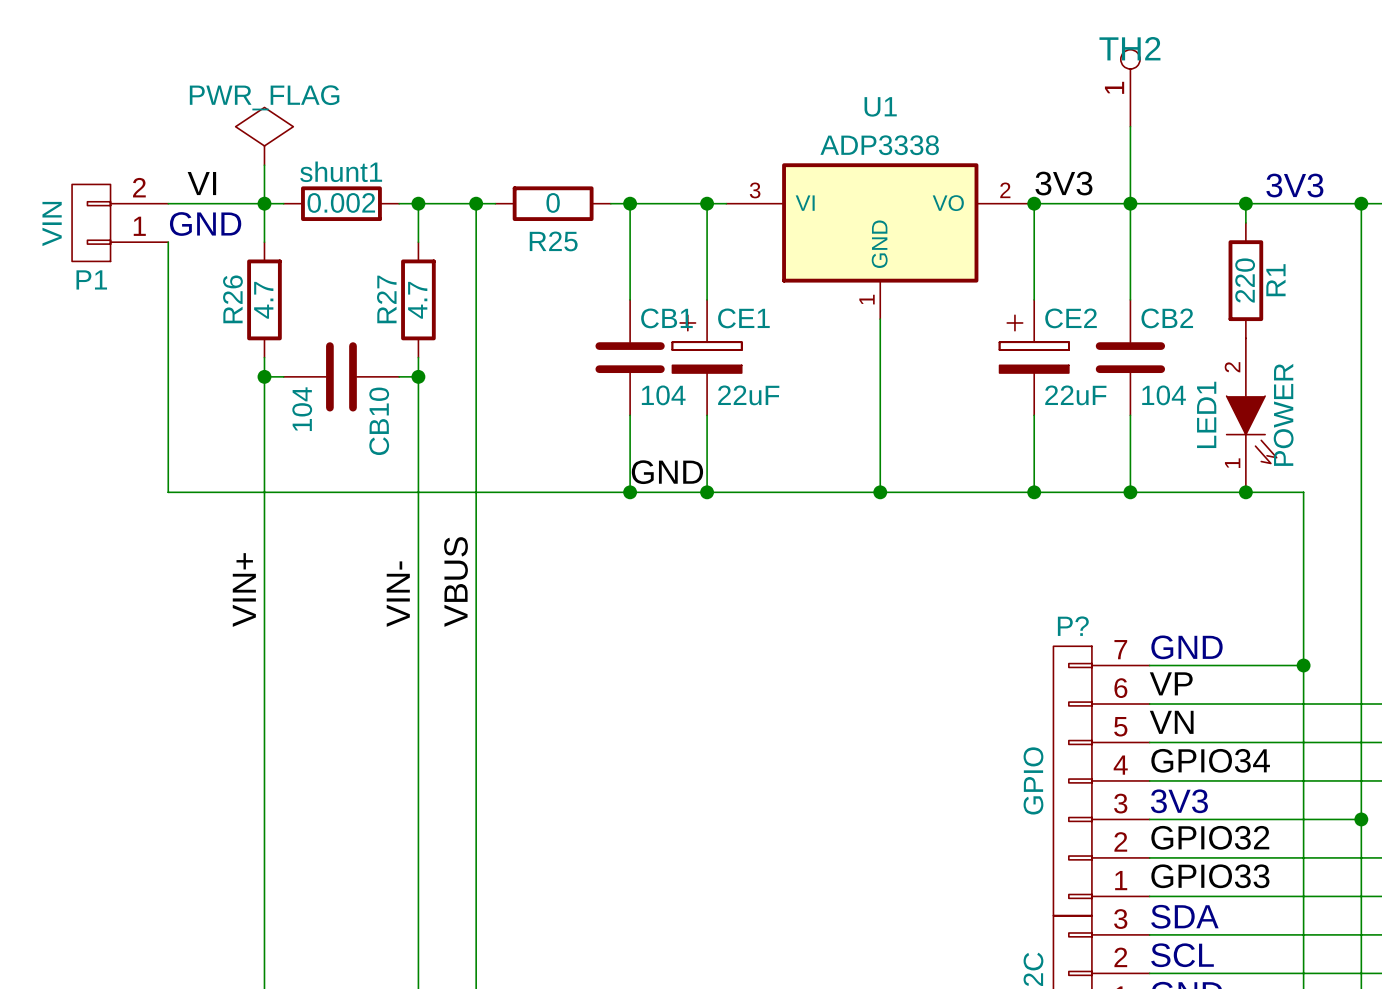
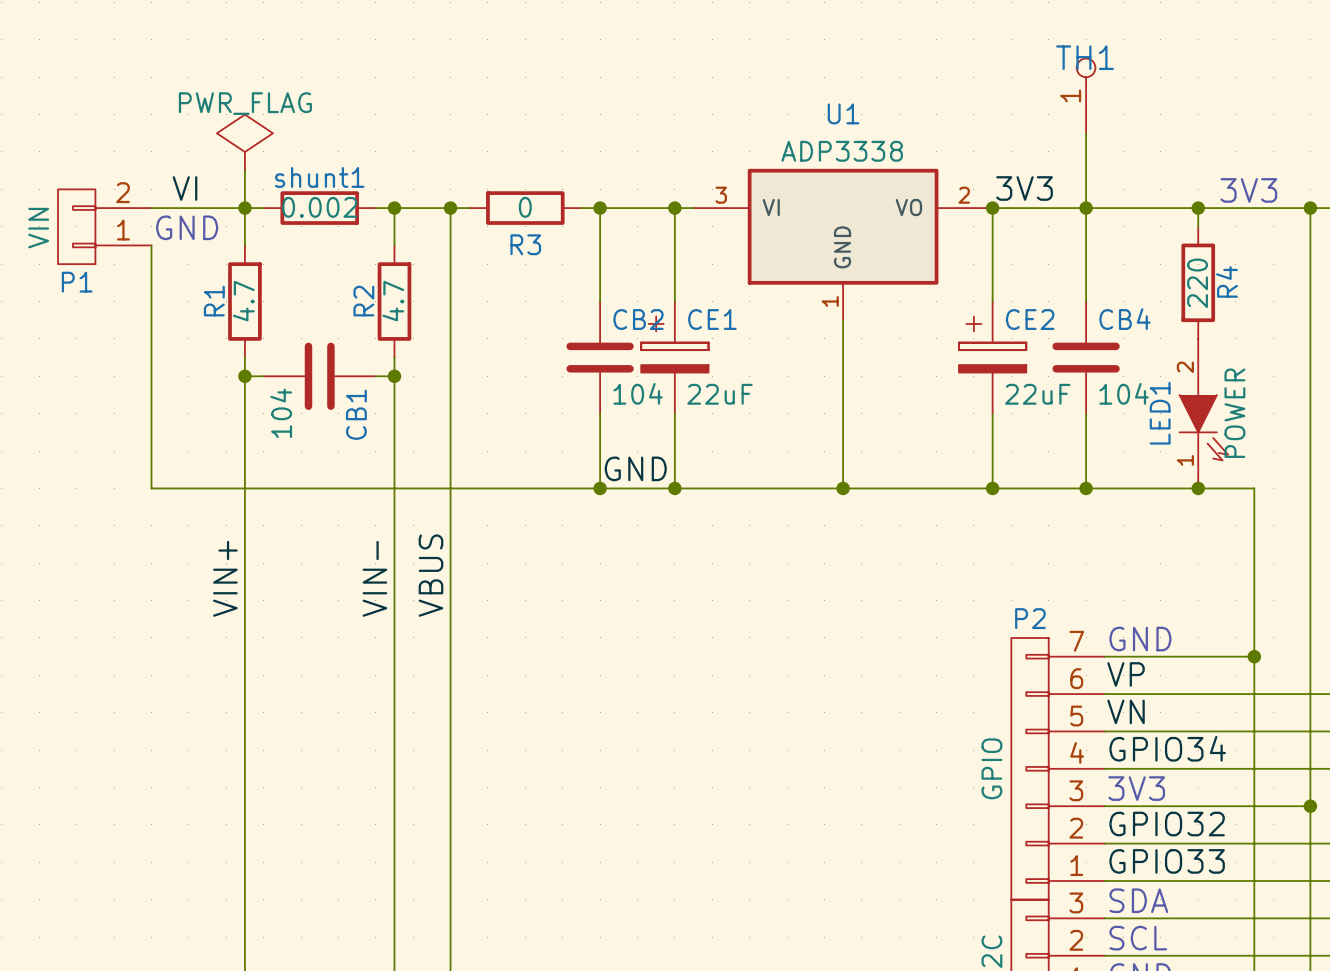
TH2 name: TH2 (1129, 48) -> TH1 (1085, 57)
R25 name: R25 (553, 241) -> R3 (525, 244)
R1 name: R1 (1275, 280) -> R4 (1227, 281)
R26 name: R26 (232, 299) -> R1 (214, 301)
R27 name: R27 (386, 299) -> R2 (363, 301)
CB1 name: CB1 (666, 318) -> CB2 (638, 319)
CB2 name: CB2 (1167, 318) -> CB4 (1124, 319)
CB10 name: CB10 (379, 421) -> CB1 (356, 414)
P? name: P? (1073, 626) -> P2 (1030, 618)

